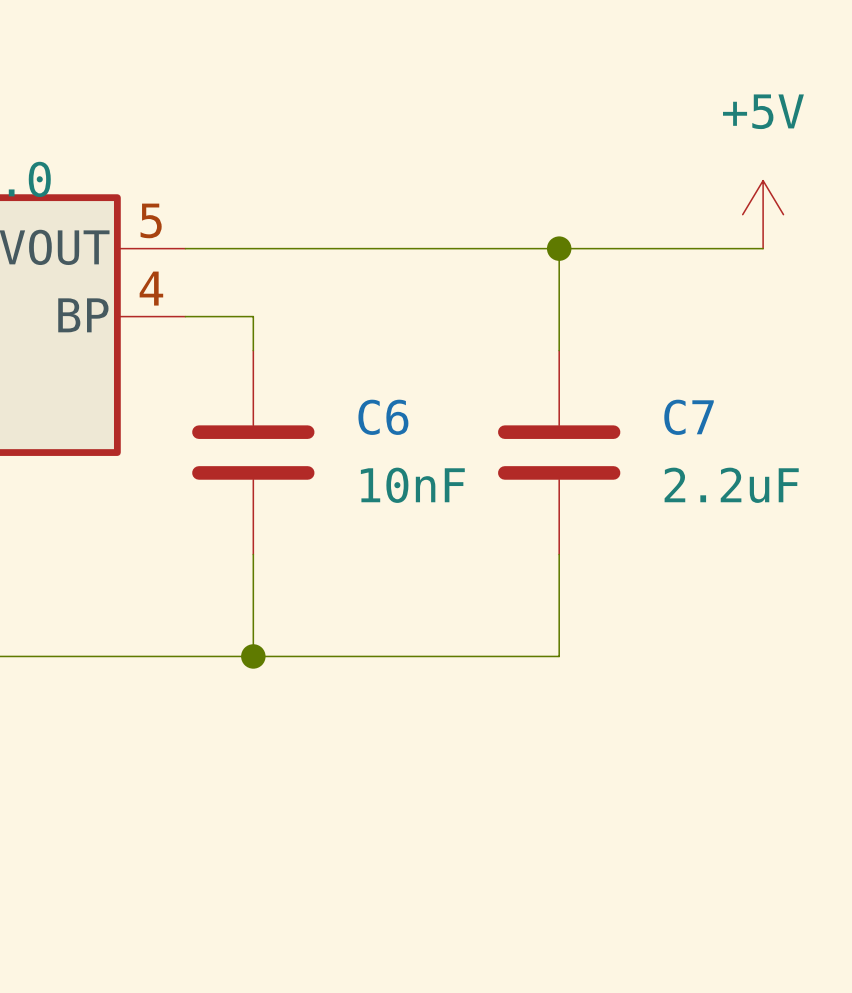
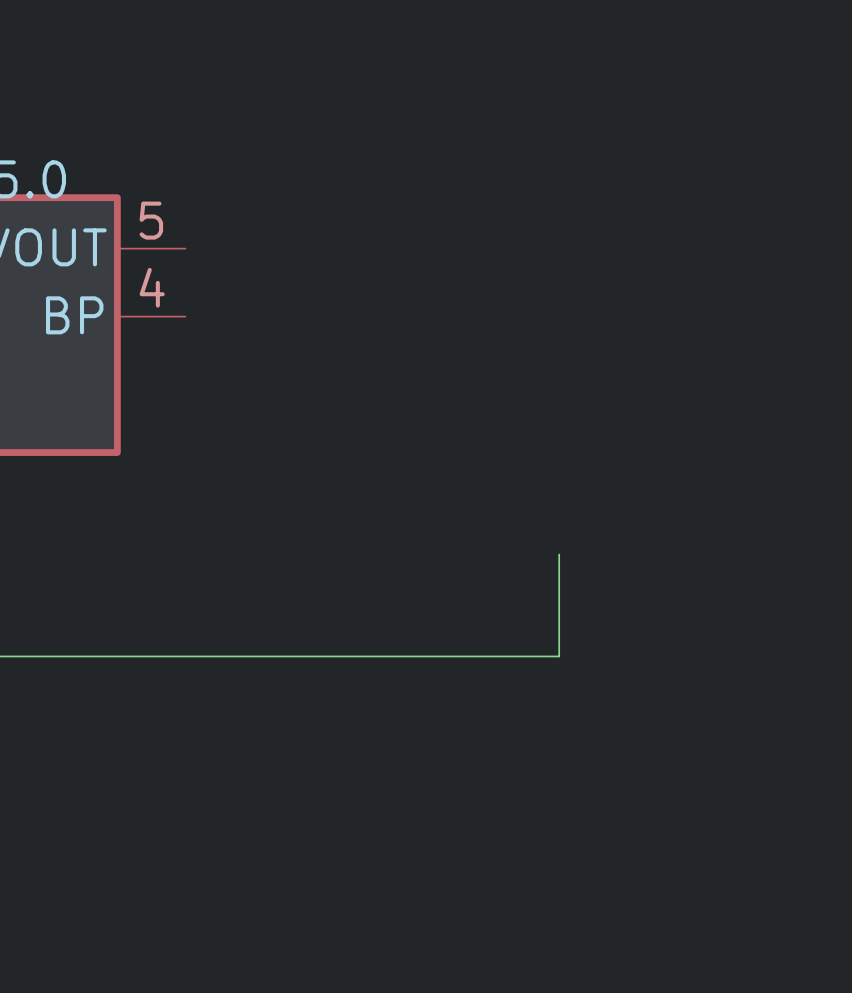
power symbol: +5V (763, 214) -> none
wire: (185, 248) (763, 248) -> none
wire: (559, 248) (559, 350) -> none
junction: (559, 248) -> none
wire: (185, 316) (253, 316) (253, 350) -> none
C6: 10nF (253, 452) -> none
C7: 2.2uF (559, 452) -> none
wire: (253, 554) (253, 656) -> none
junction: (253, 656) -> none

